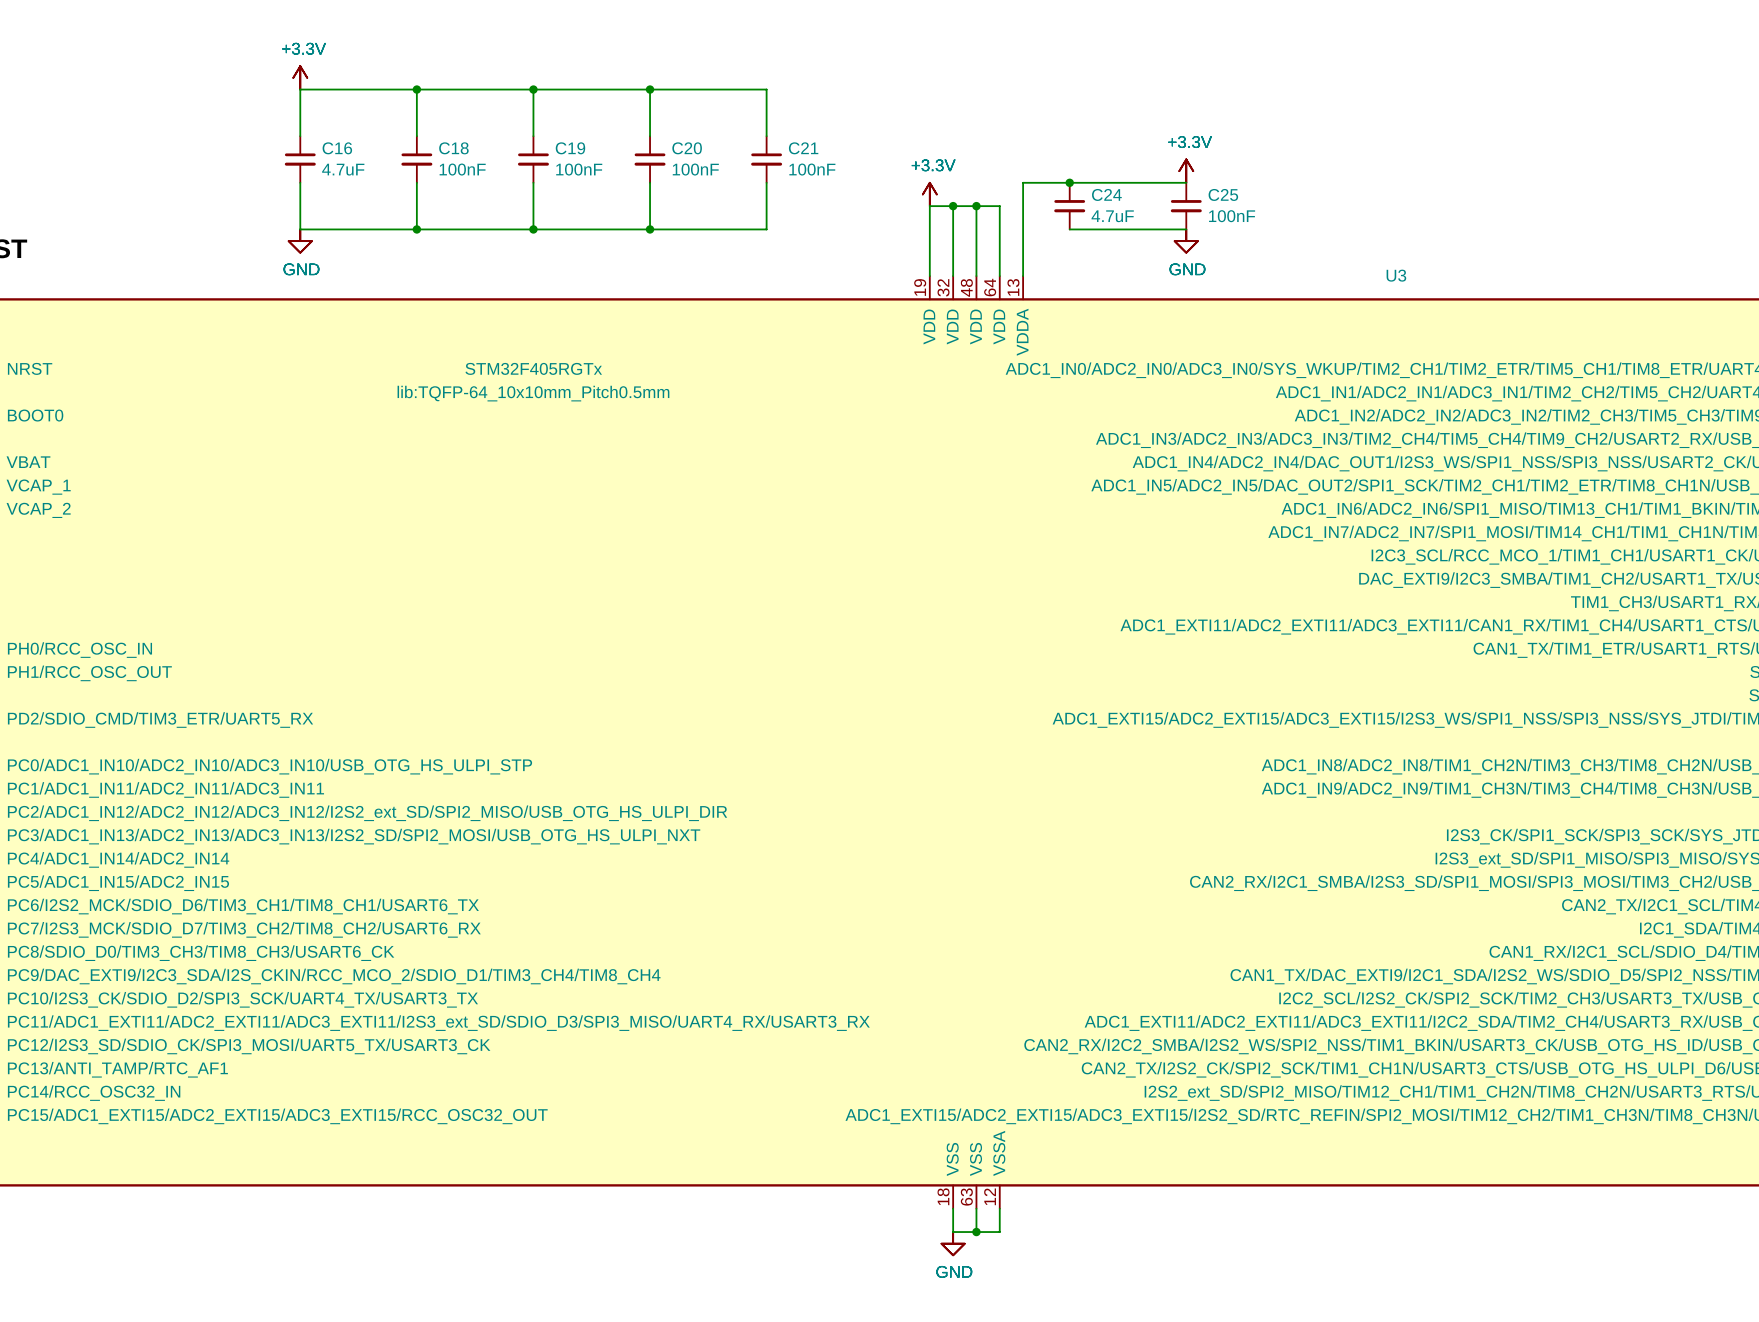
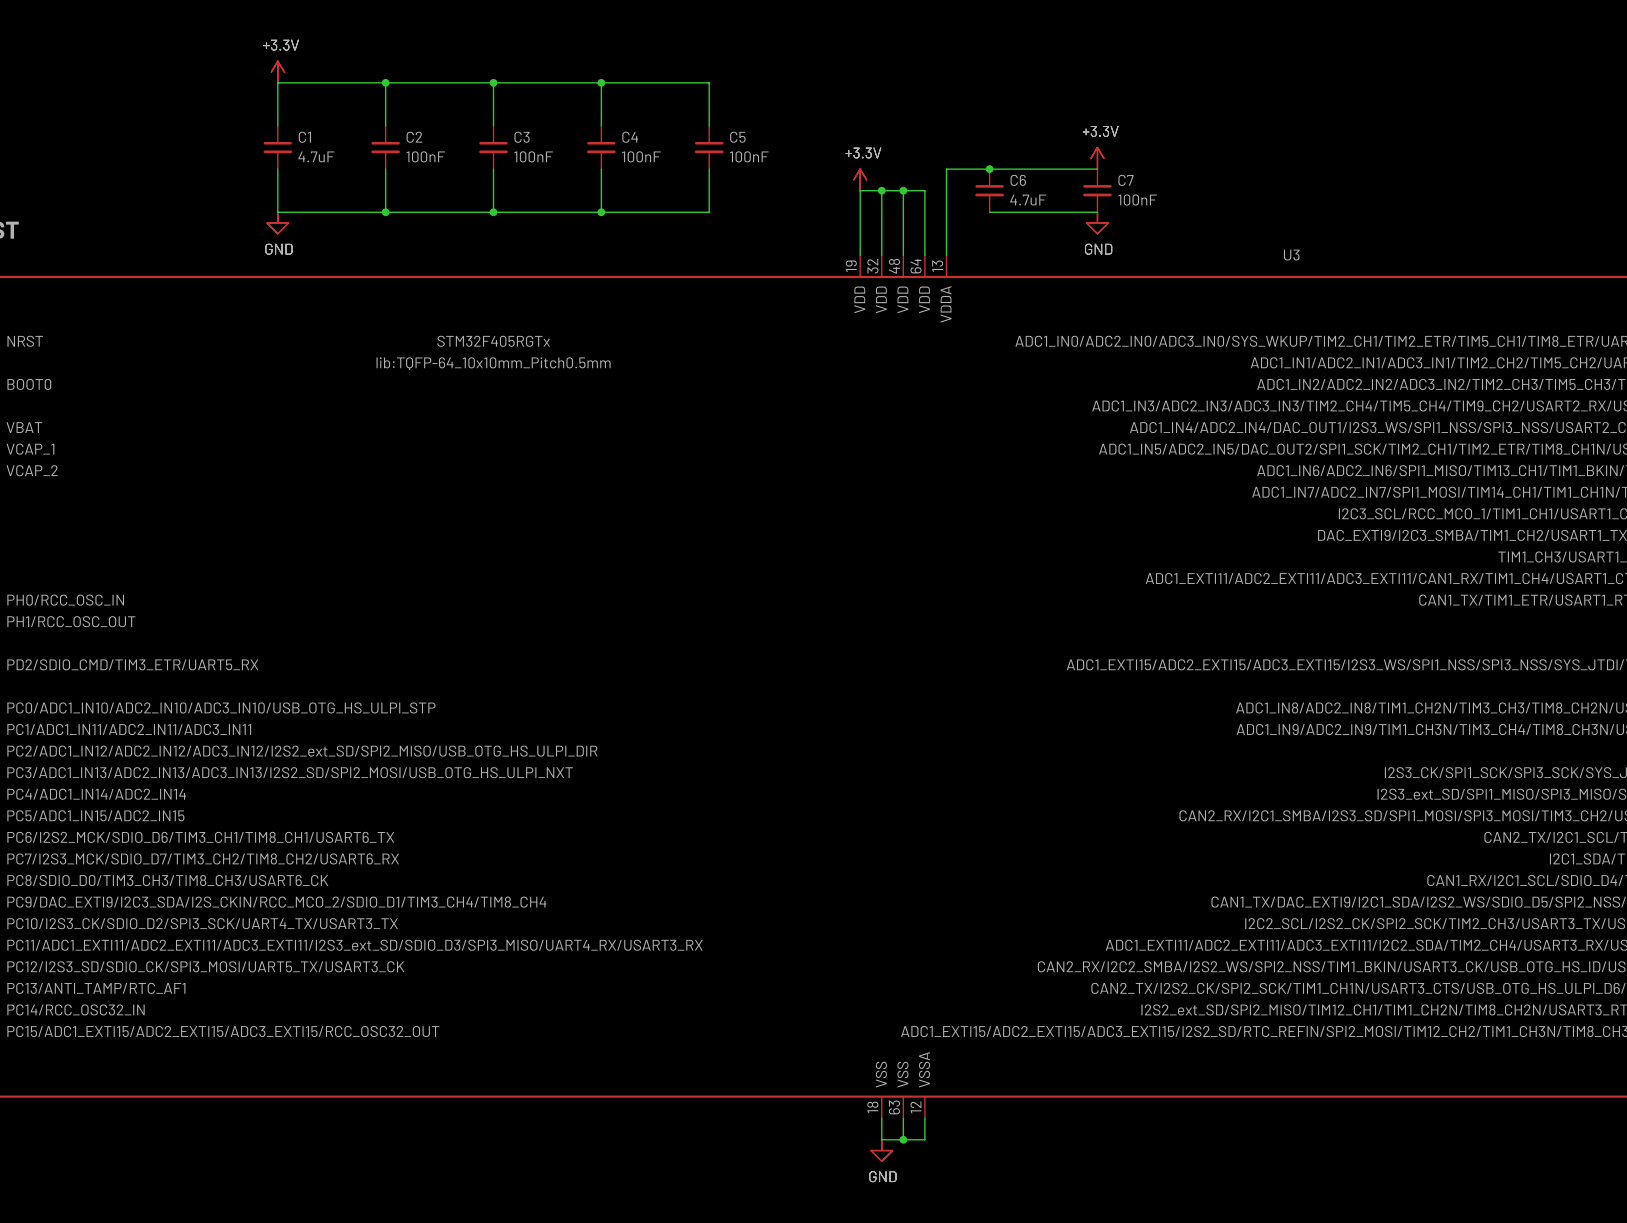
C16 name: C16 (337, 148) -> C1 (304, 137)
C18 name: C18 (453, 148) -> C2 (414, 137)
C19 name: C19 (570, 148) -> C3 (522, 137)
C20 name: C20 (687, 148) -> C4 (630, 137)
C21 name: C21 (803, 148) -> C5 (737, 137)
C24 name: C24 (1106, 194) -> C6 (1018, 180)
C25 name: C25 (1223, 194) -> C7 (1126, 180)

